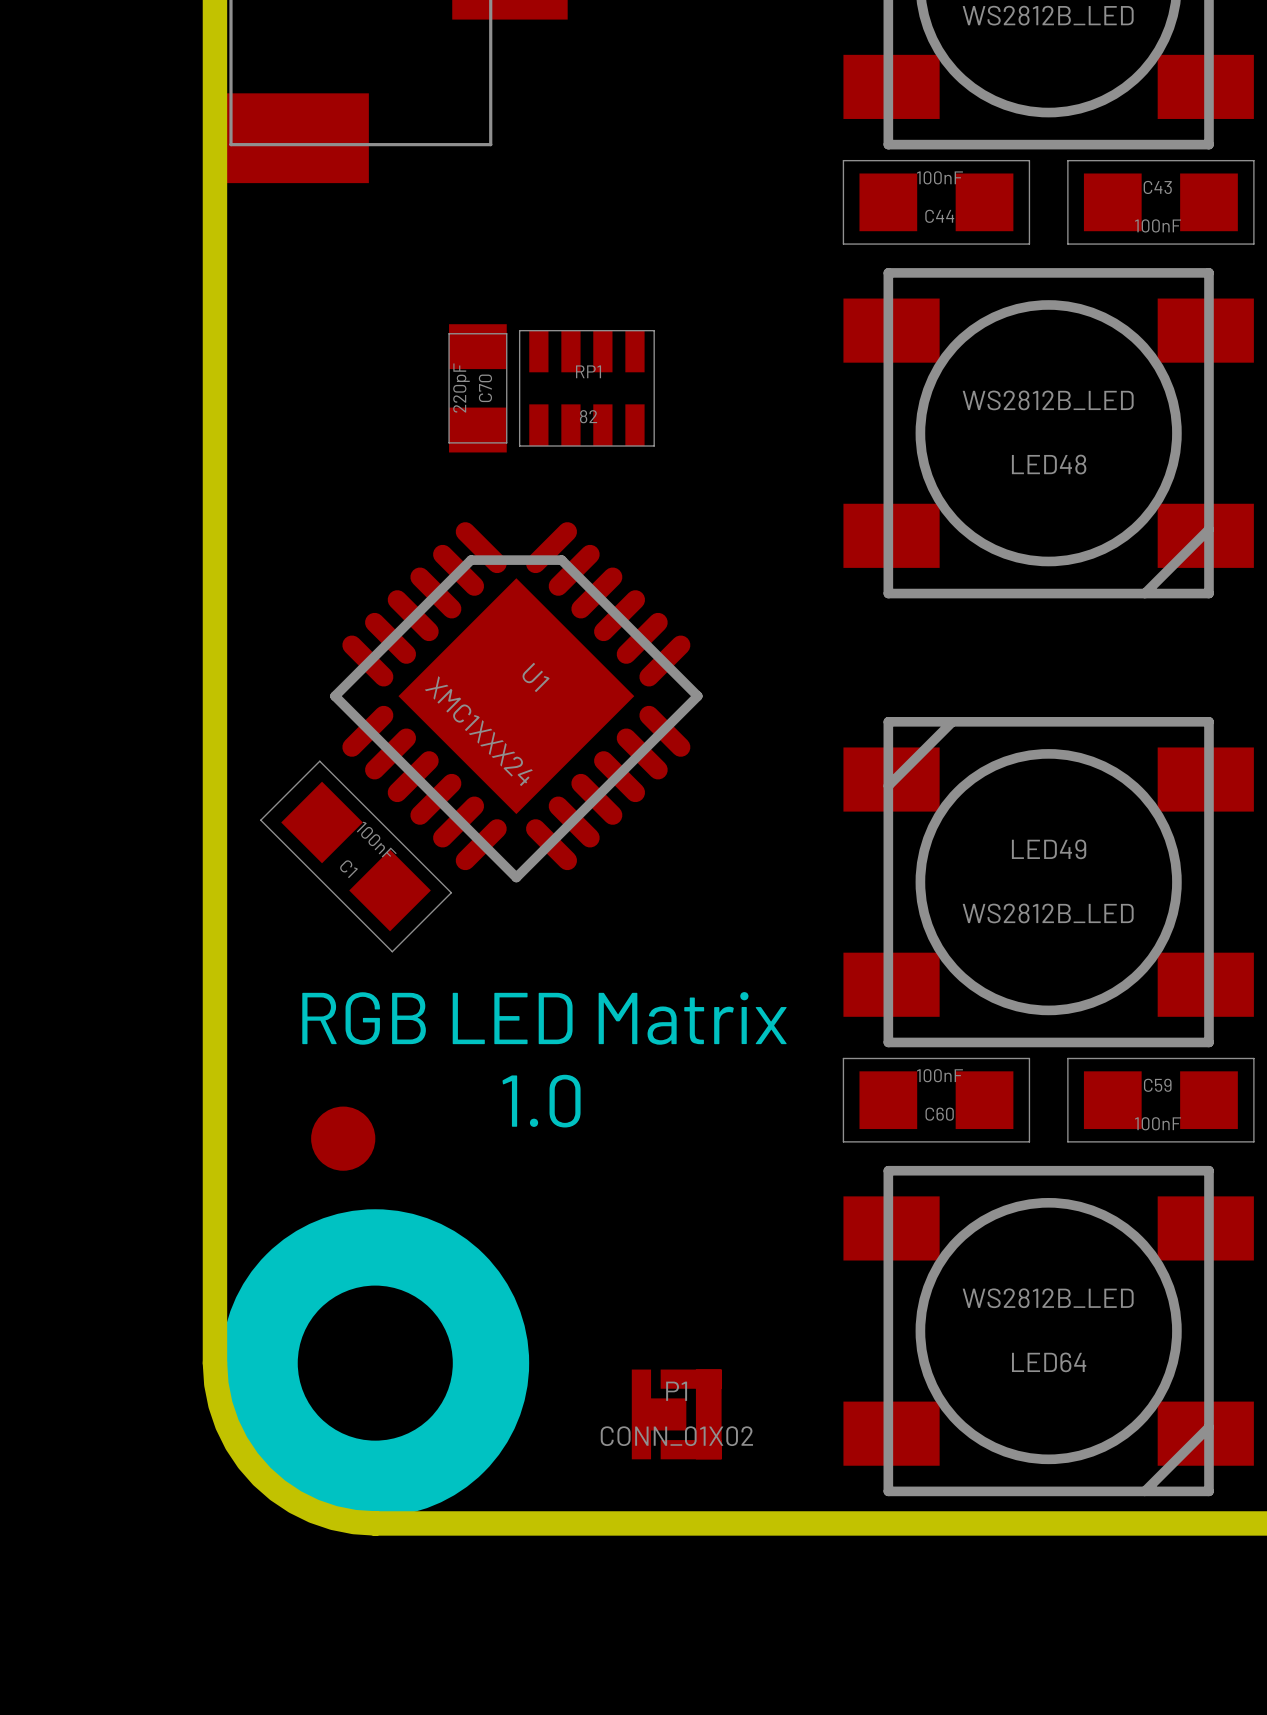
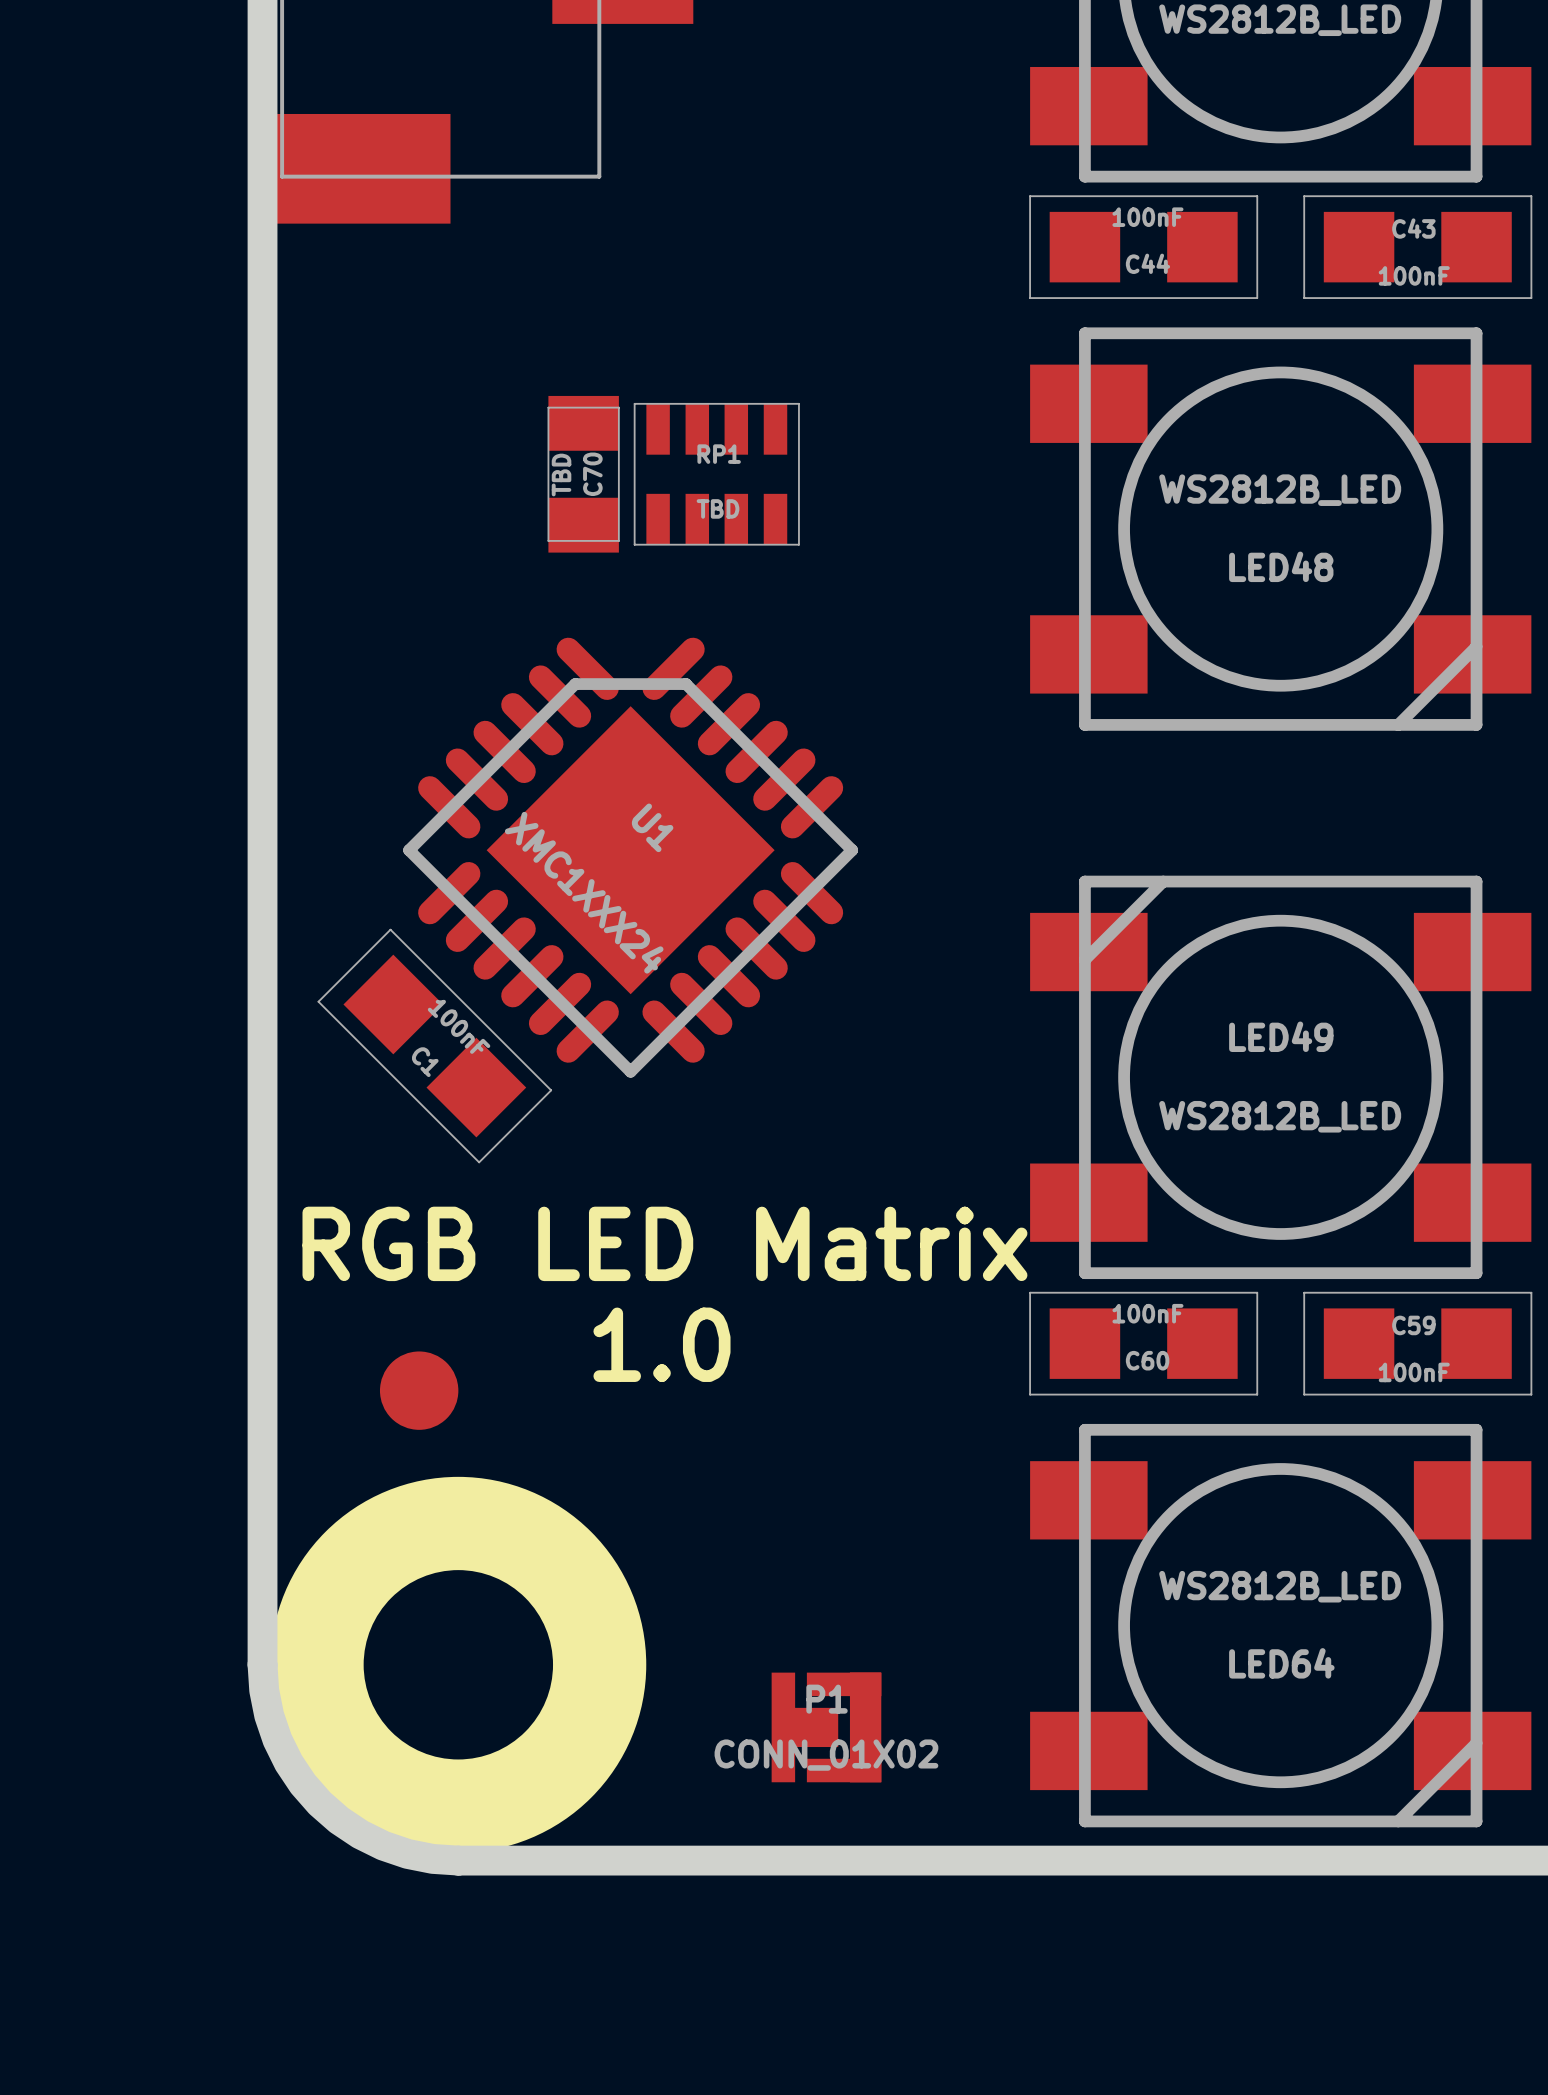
C70 value: 220pF (461, 388) -> TBD (561, 475)
RP1 value: 82 (588, 416) -> TBD (718, 508)

